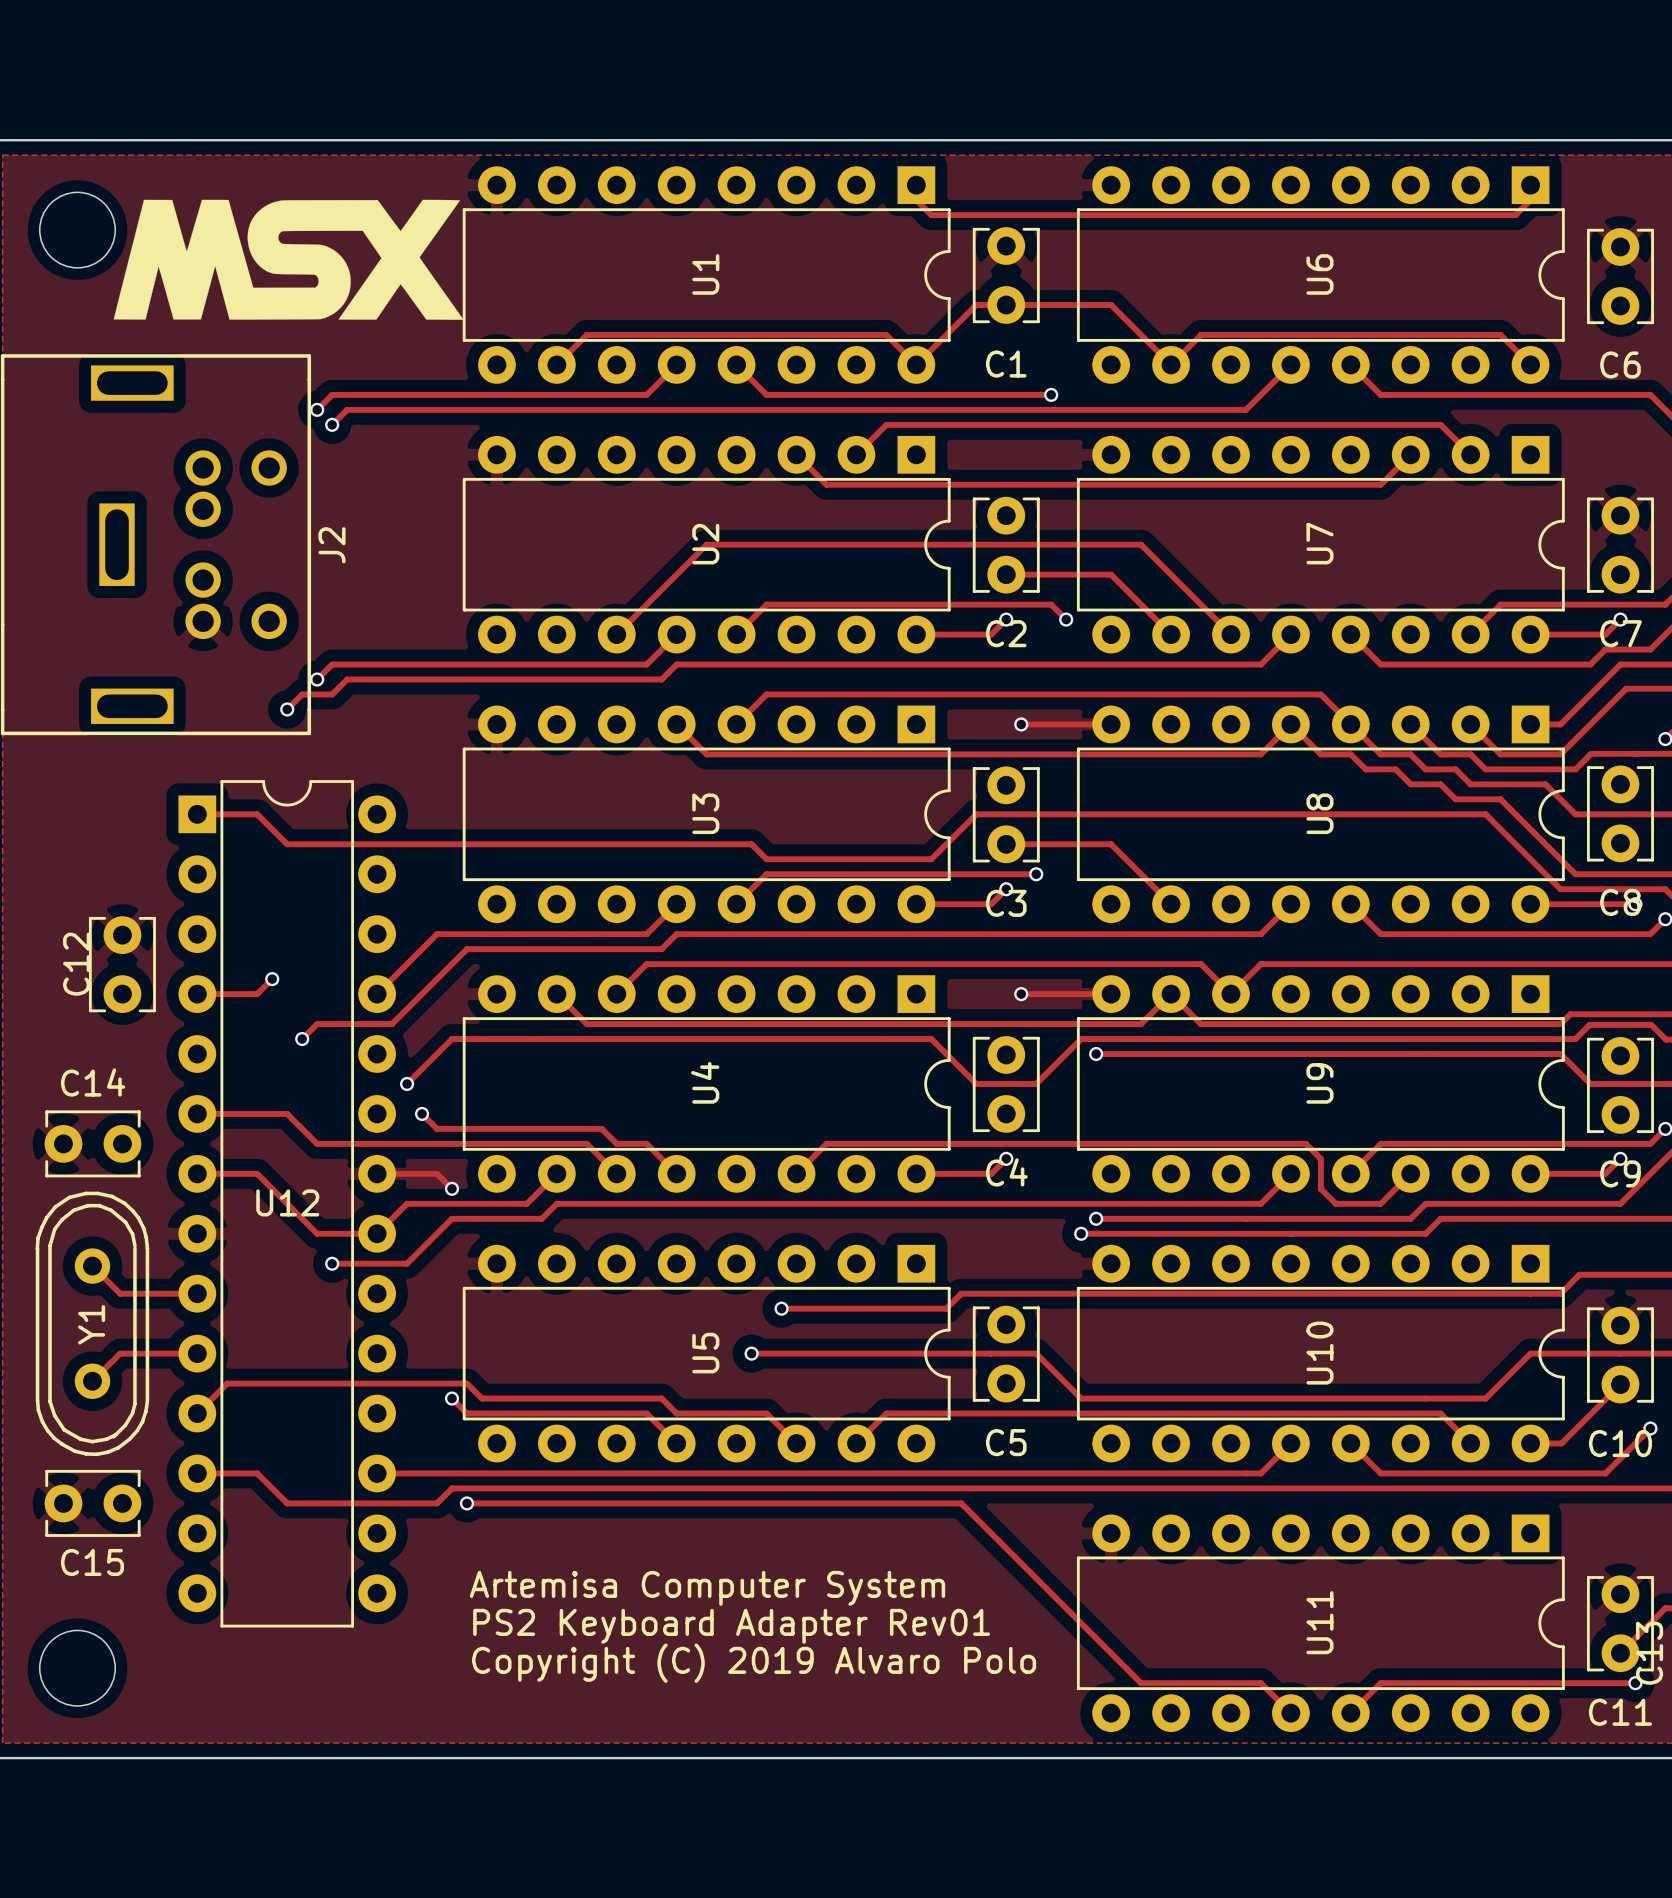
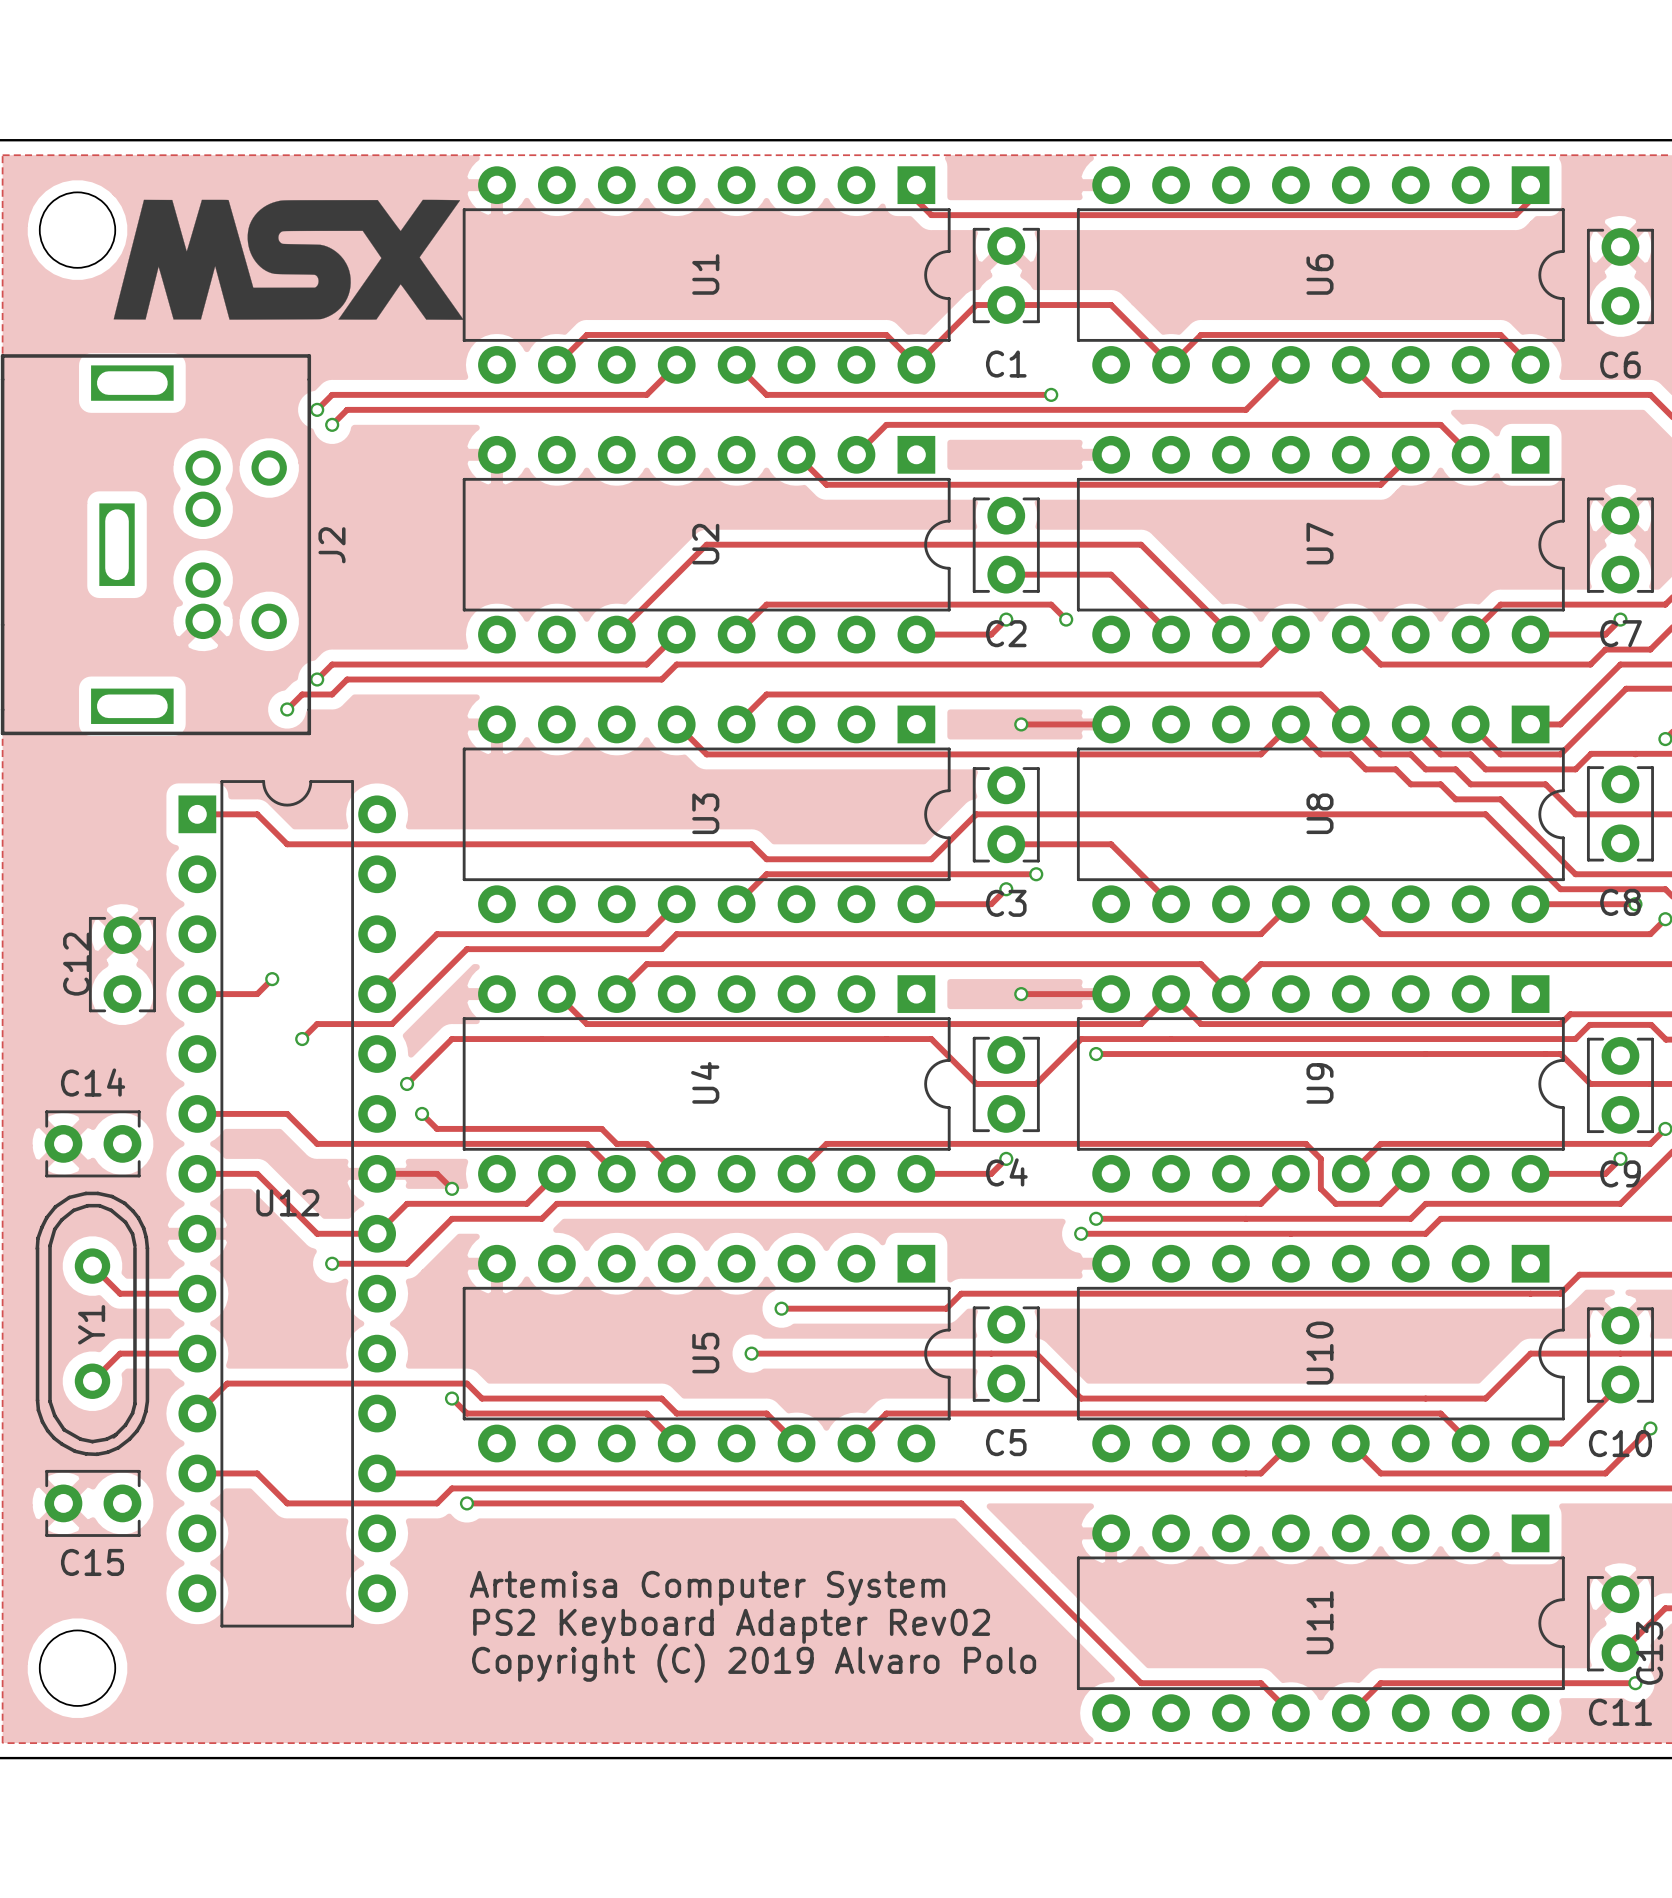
text: PS2 Keyboard Adapter Rev01 (731, 1626) -> PS2 Keyboard Adapter Rev02 (731, 1626)

